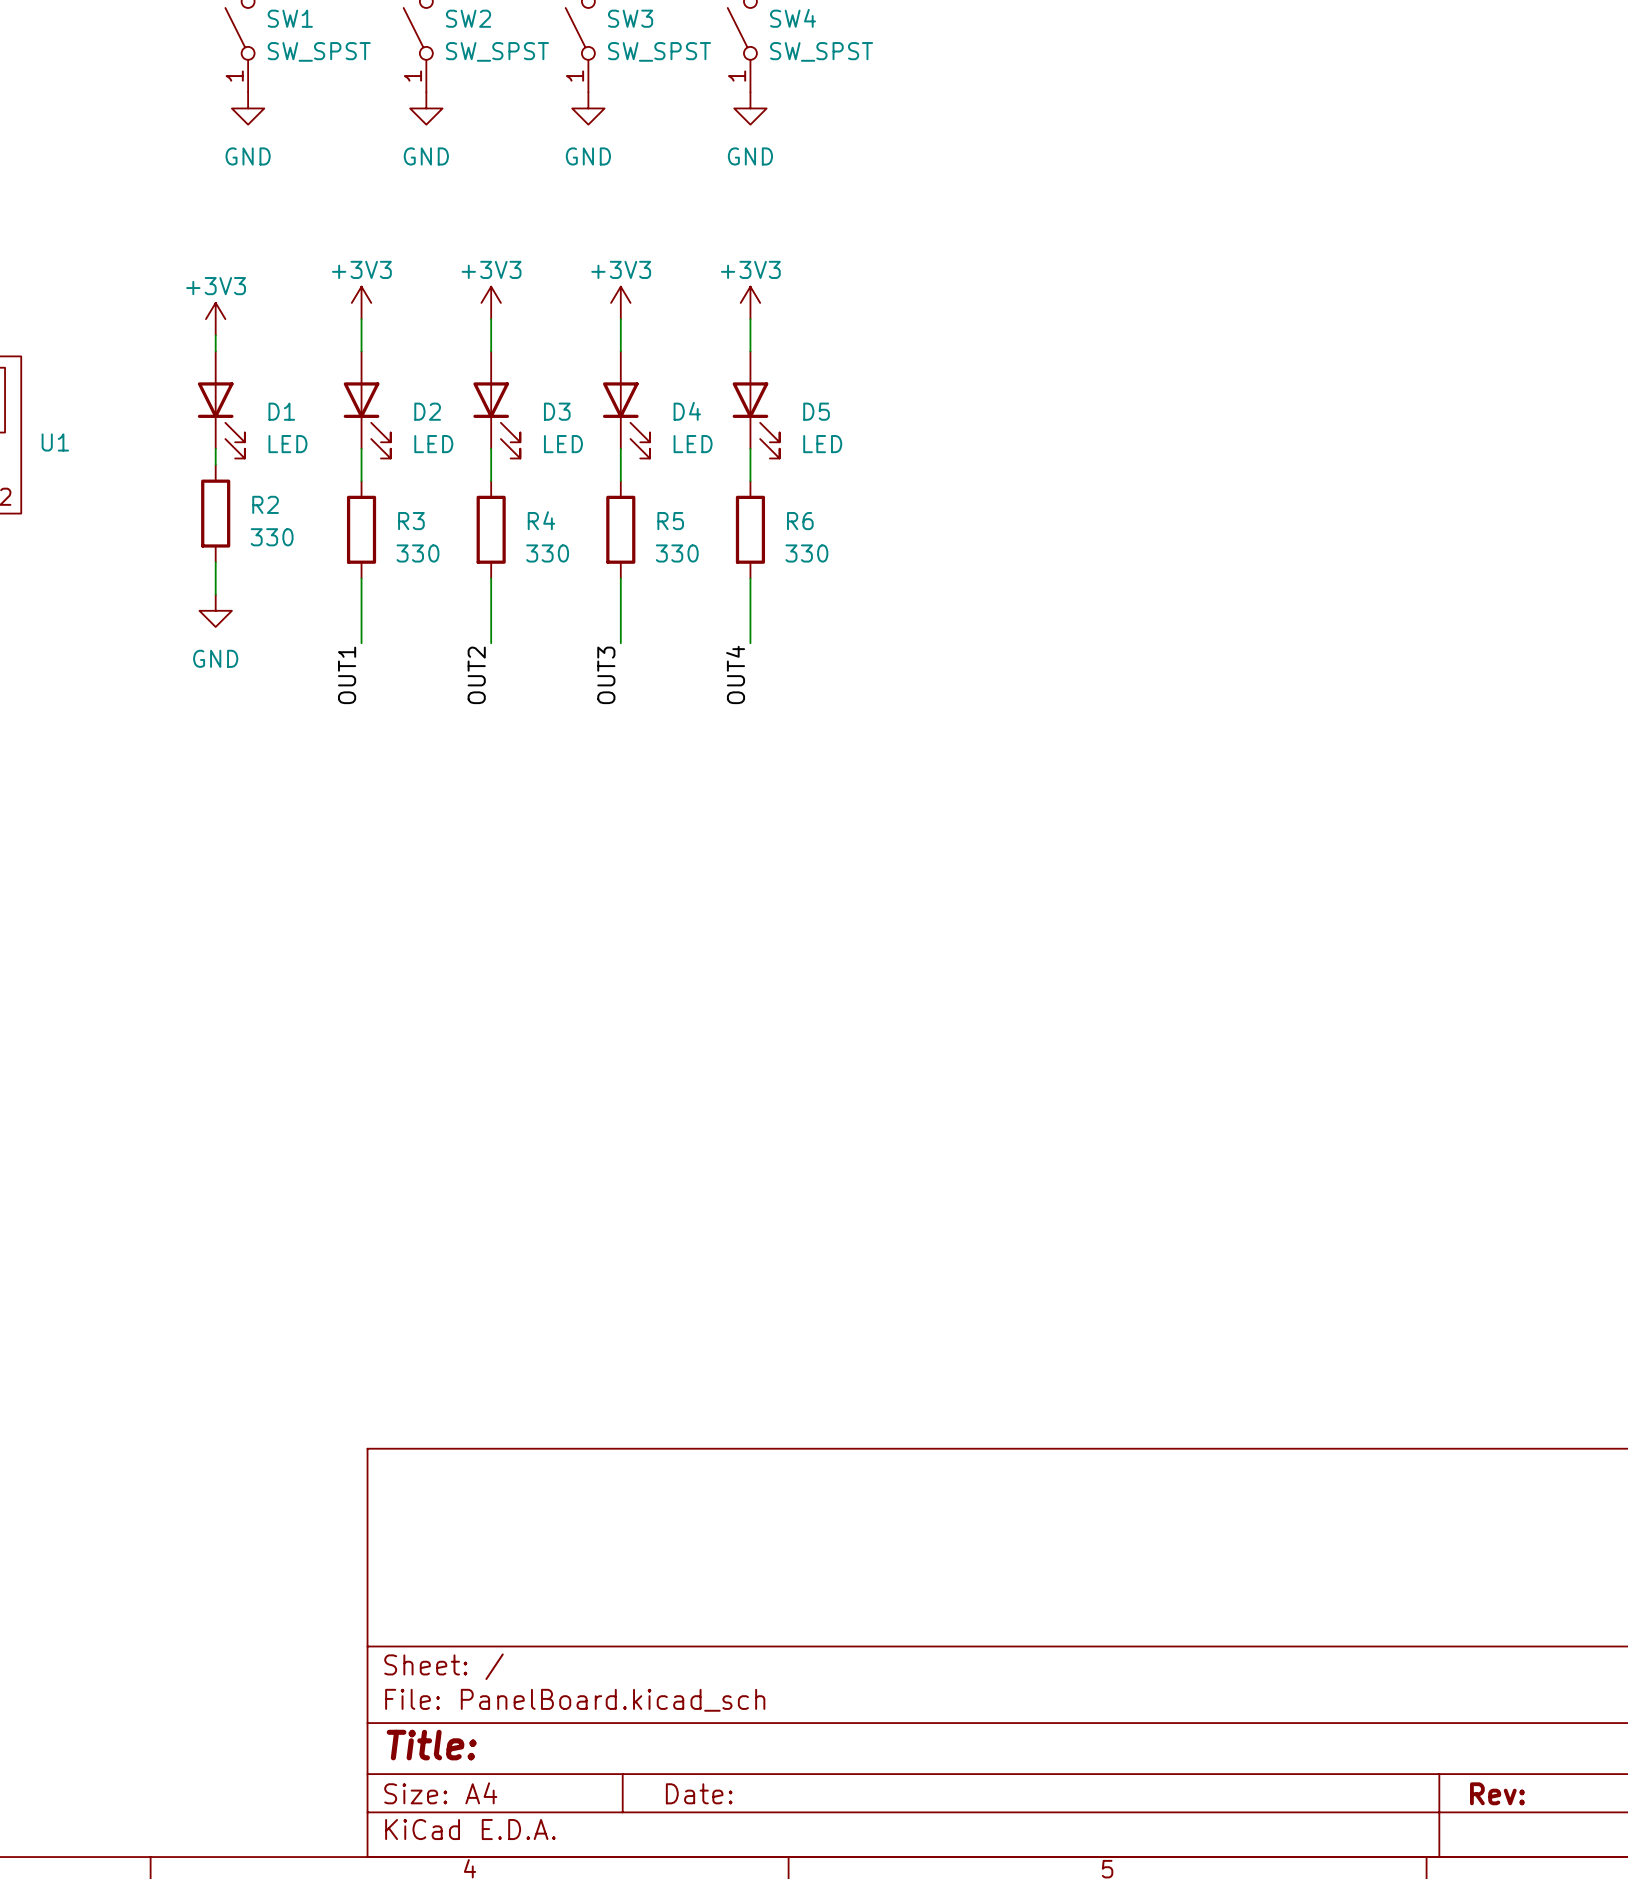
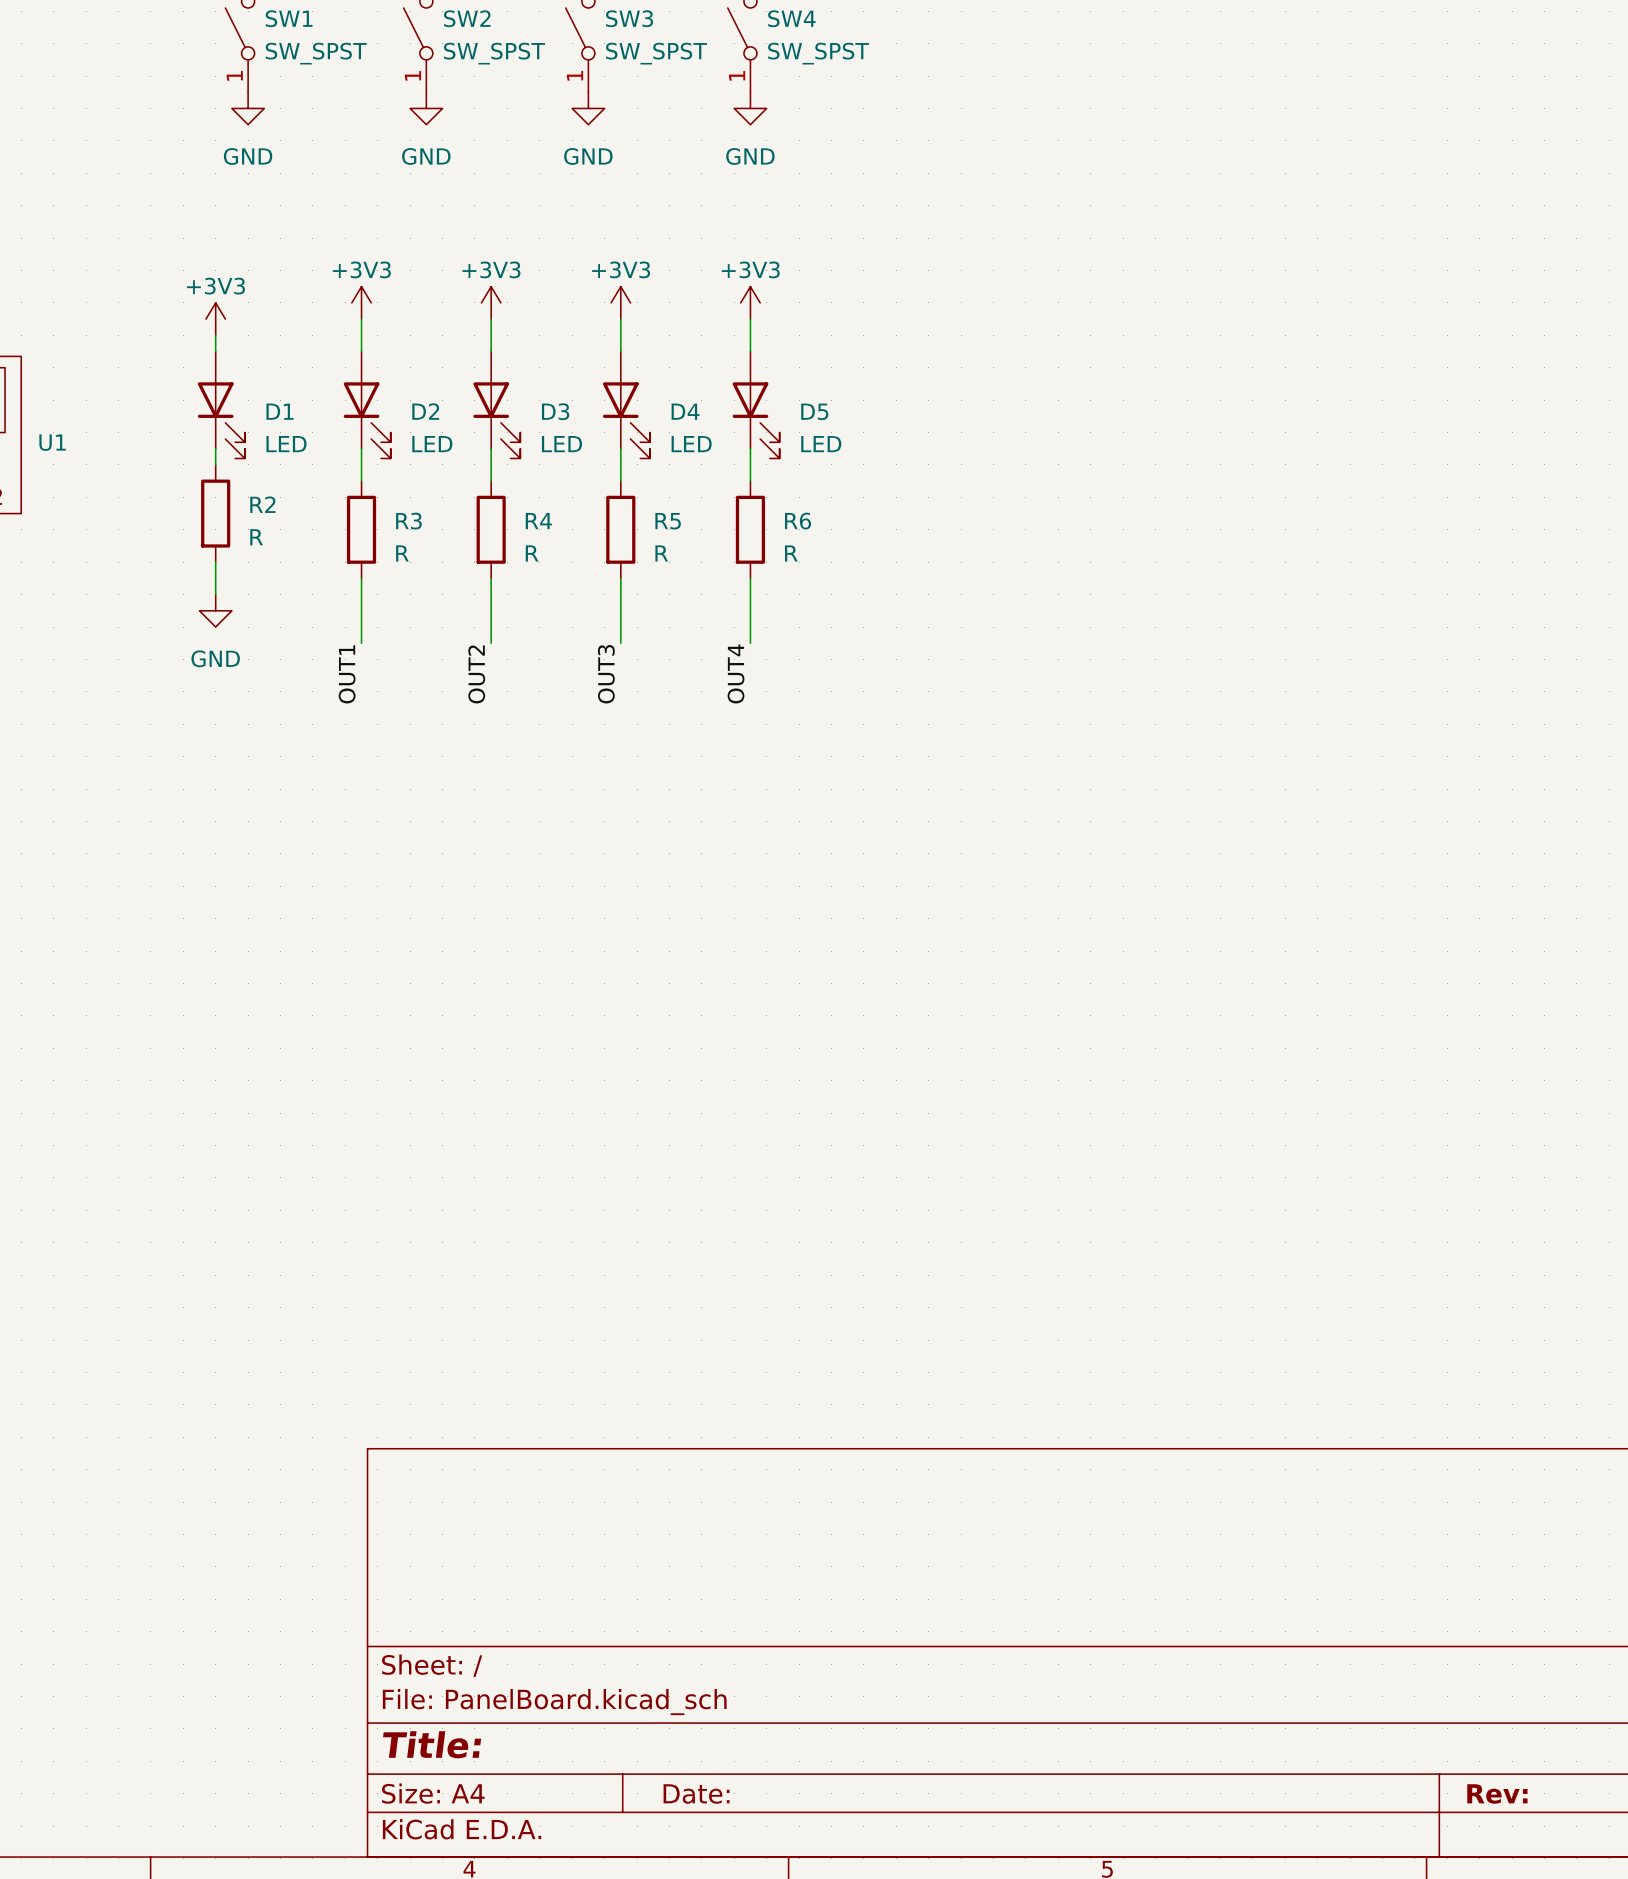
R2 value: 330 (272, 537) -> R (256, 537)
R3 value: 330 (417, 553) -> R (402, 553)
R4 value: 330 (547, 553) -> R (532, 553)
R5 value: 330 (677, 553) -> R (661, 553)
R6 value: 330 (806, 553) -> R (791, 553)

